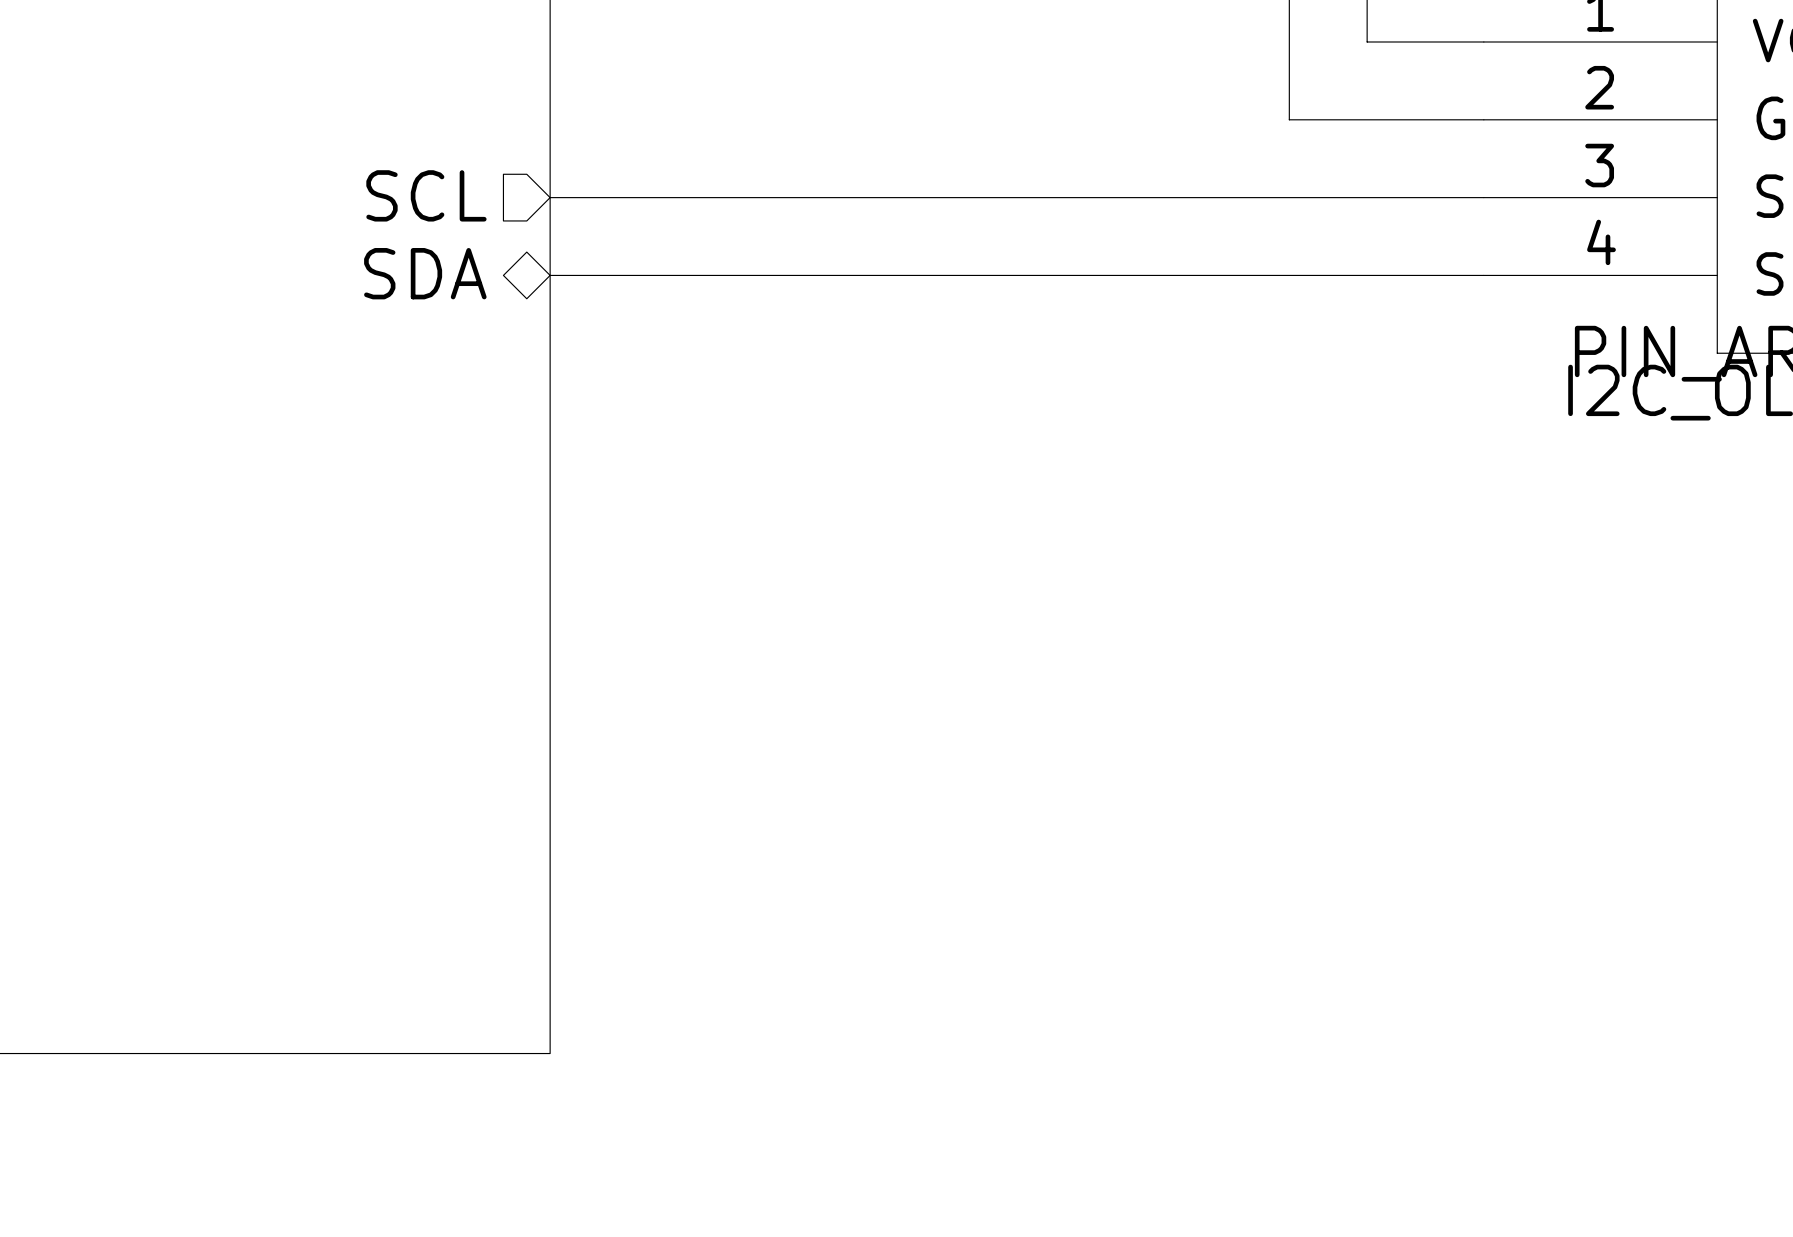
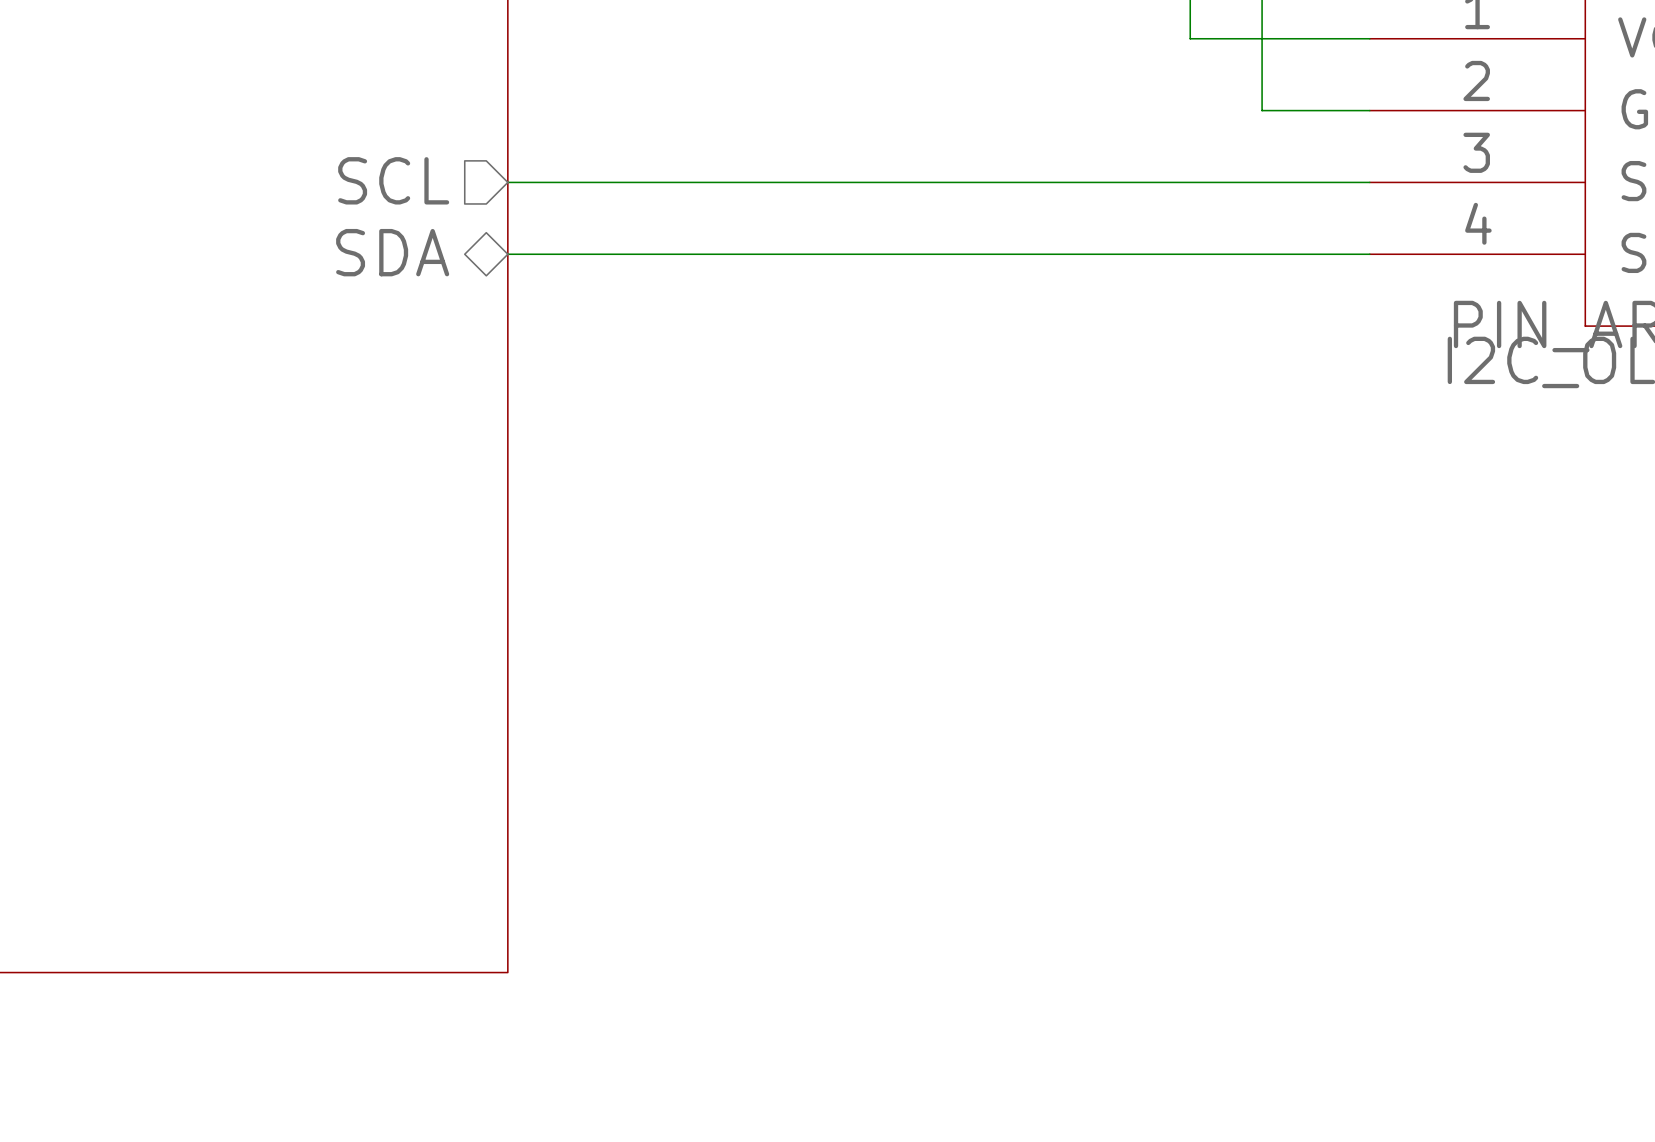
wire: (1289, 41) (1289, 119) (1367, 119) -> (1190, 38) (1262, 38) (1262, 110)

